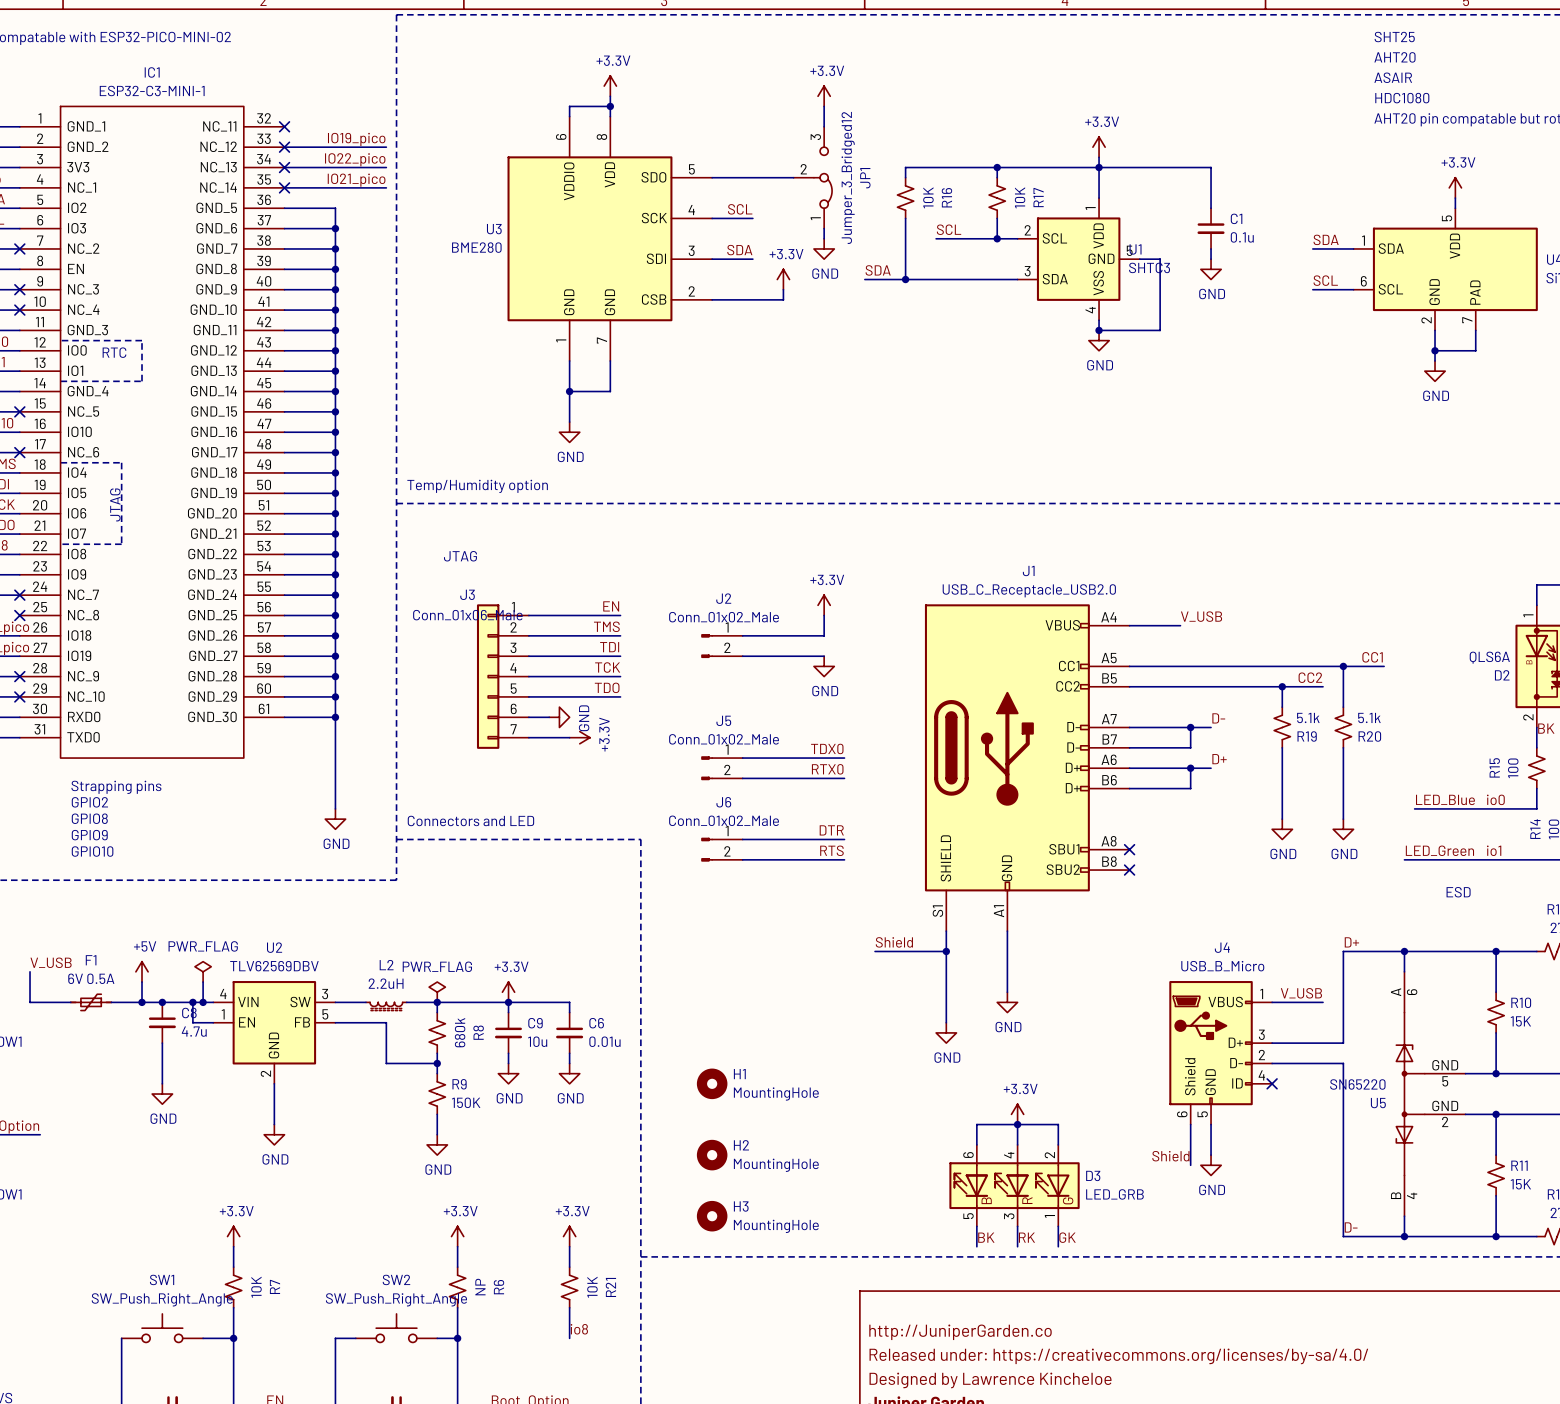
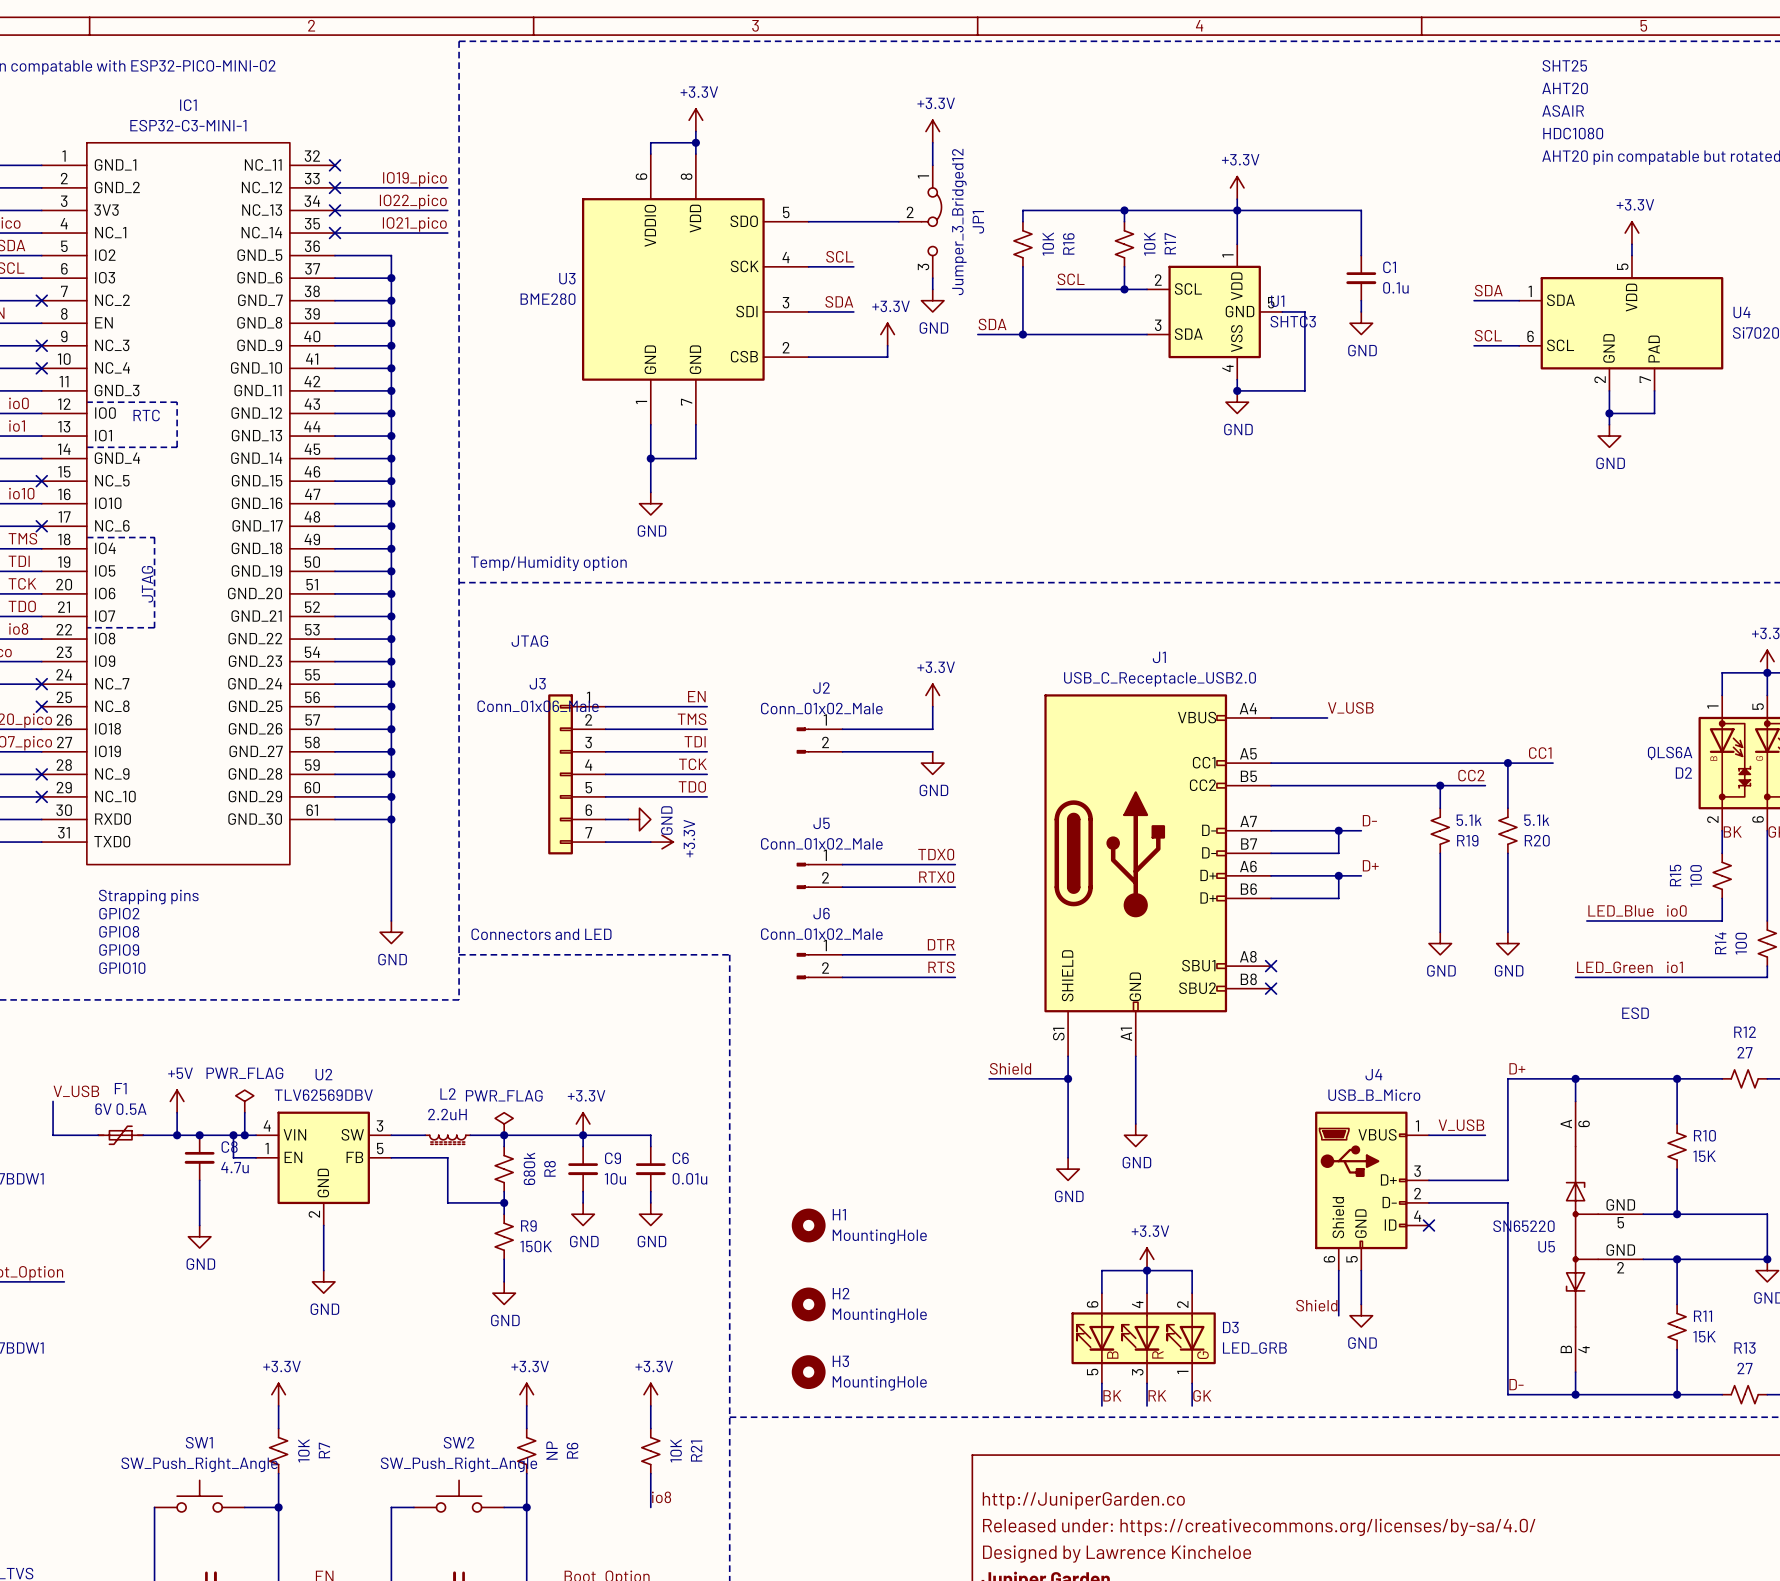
JP1 flip: as is (823, 177) -> up-down (931, 221)

